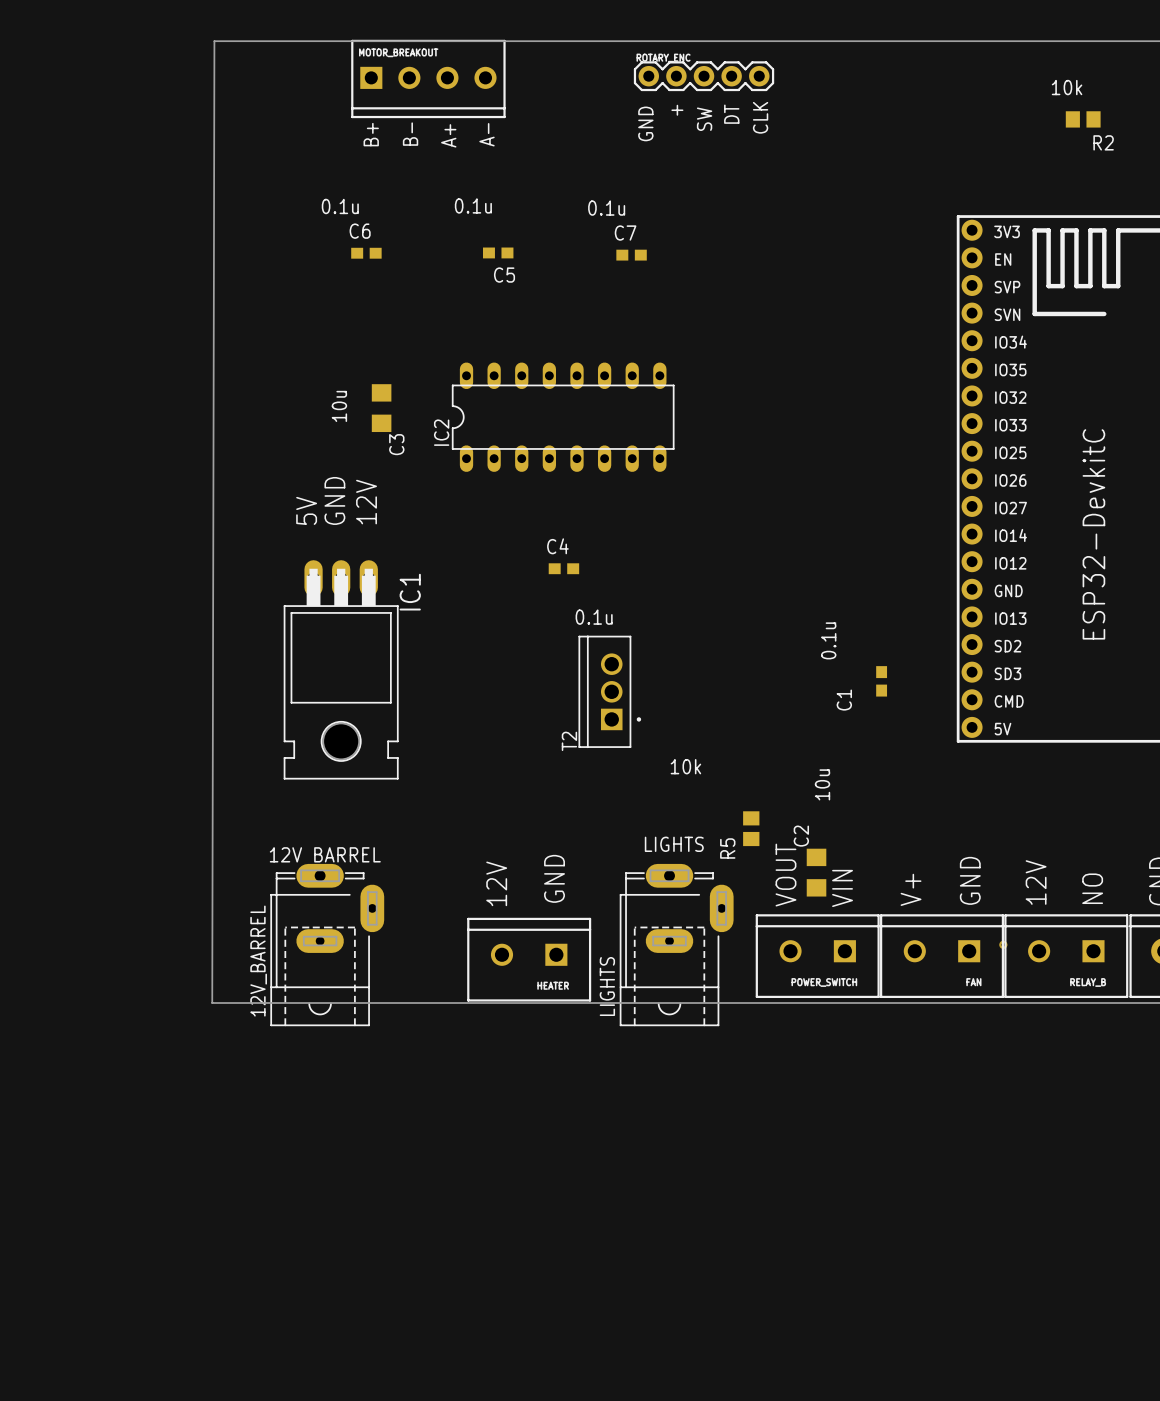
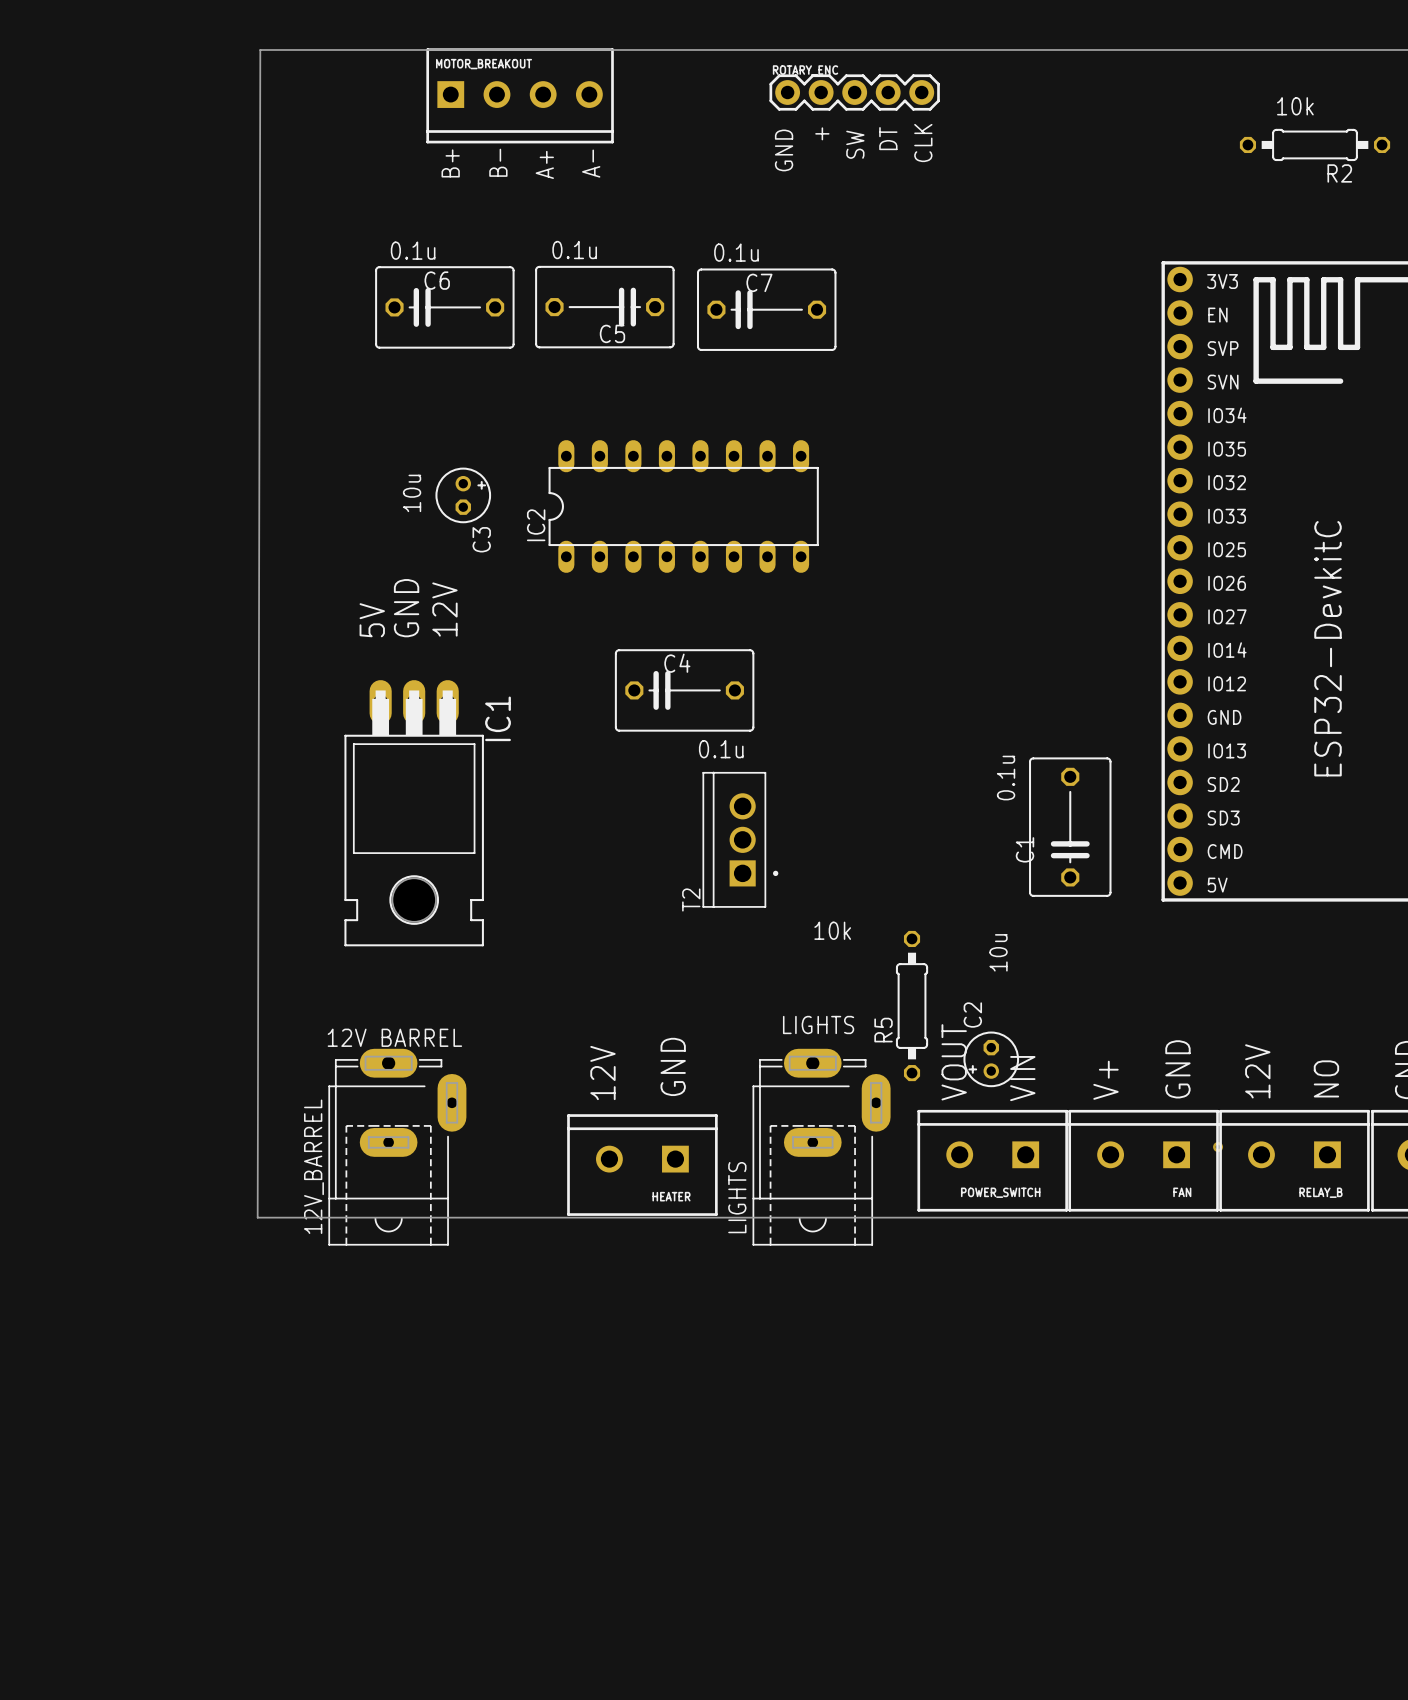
R2 footprint: [1065, 111, 1101, 128] -> [1239, 128, 1391, 162]
C6 footprint: [351, 247, 382, 259] -> [375, 266, 515, 349]
C5 footprint: [482, 247, 514, 259] -> [535, 265, 675, 349]
C7 footprint: [616, 249, 647, 261] -> [696, 268, 837, 351]
C3 footprint: [371, 384, 392, 433] -> [435, 467, 492, 524]
C4 footprint: [548, 563, 580, 575] -> [614, 649, 755, 732]
C1 footprint: [876, 666, 888, 697] -> [1029, 757, 1112, 897]
R5 footprint: [743, 811, 760, 847] -> [895, 930, 929, 1082]
C2 footprint: [806, 848, 827, 897] -> [963, 1031, 1020, 1088]

